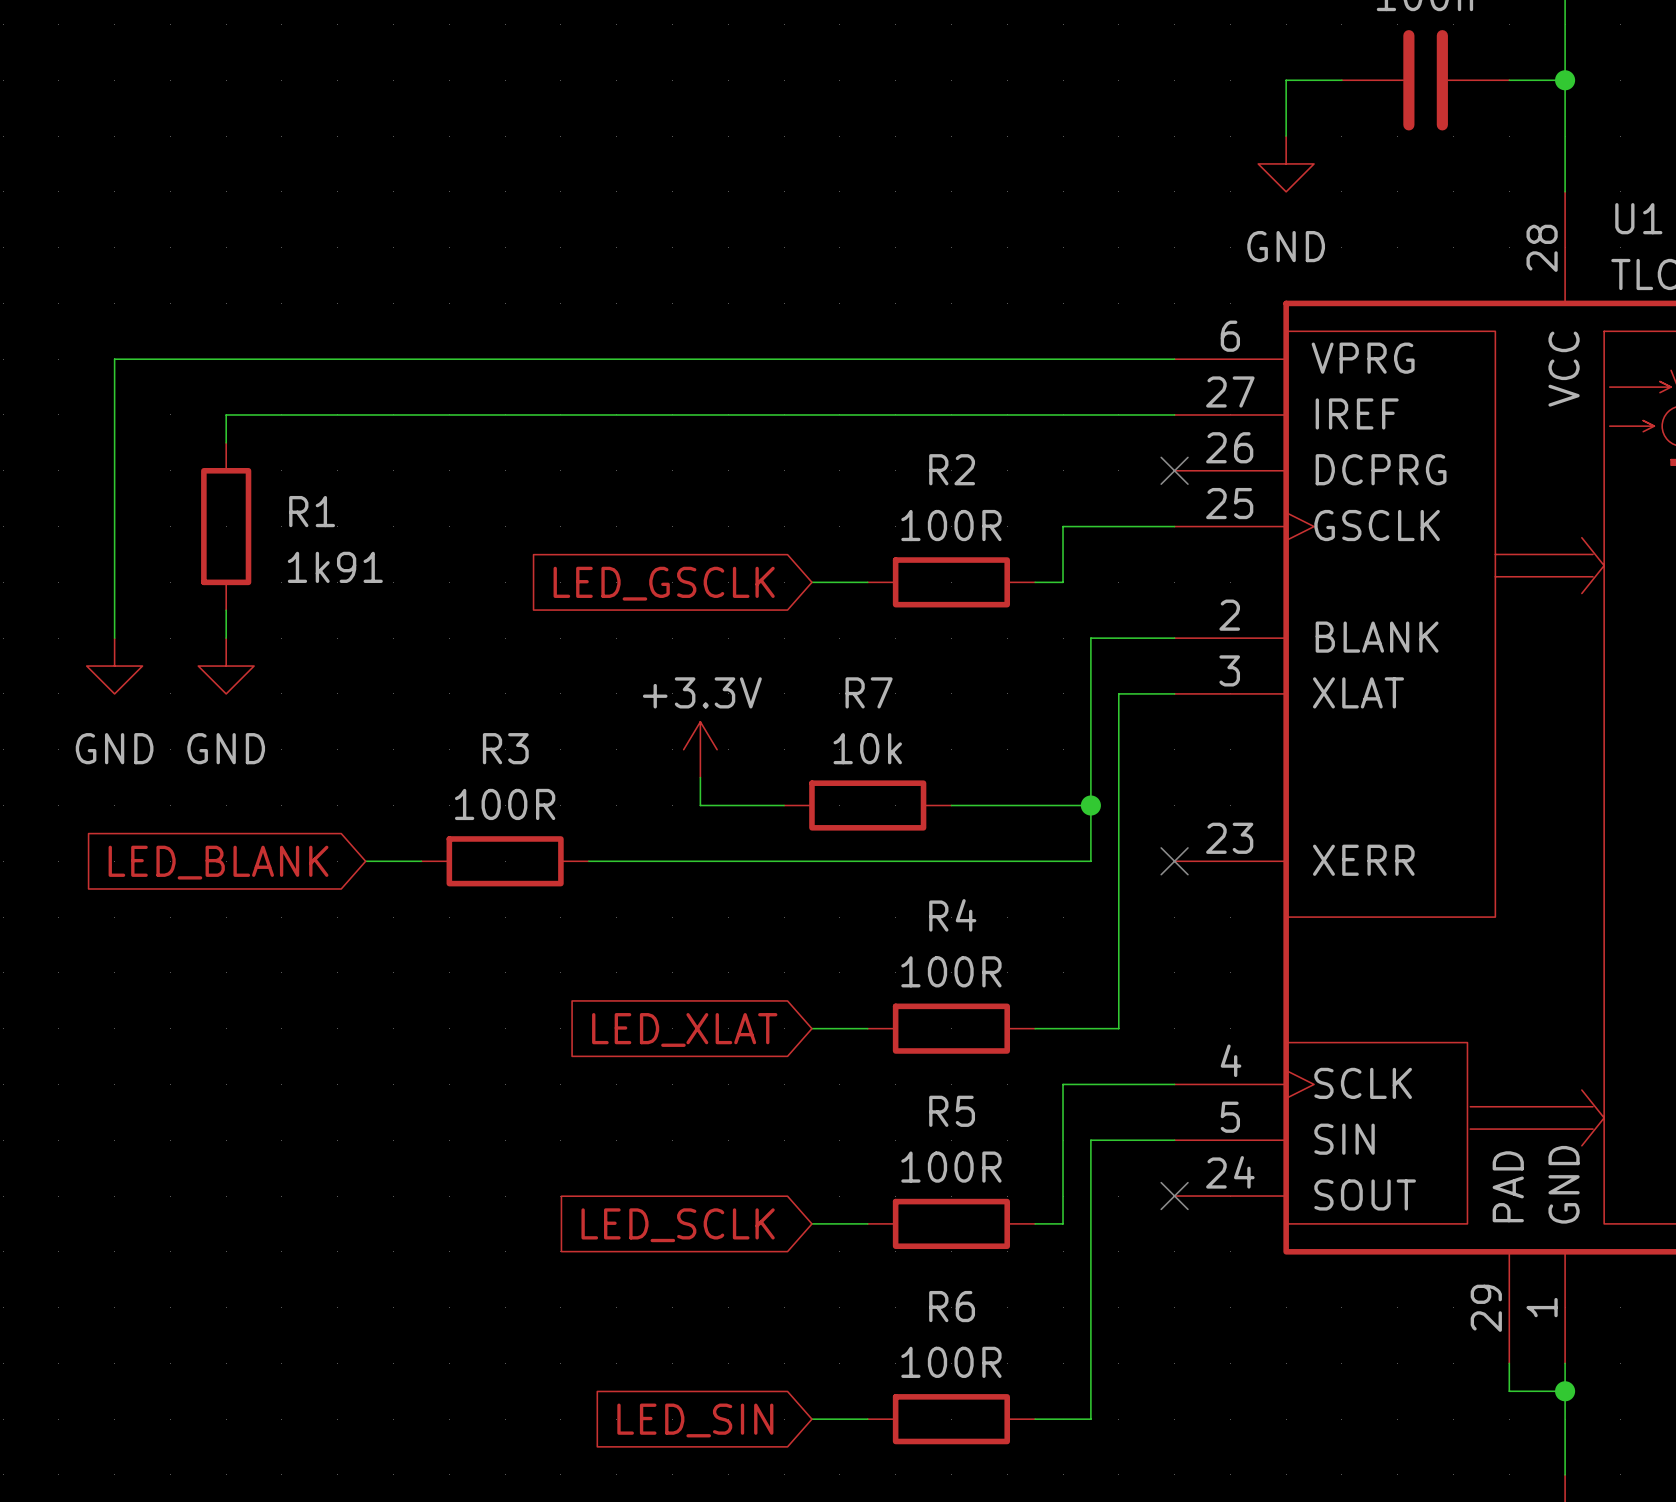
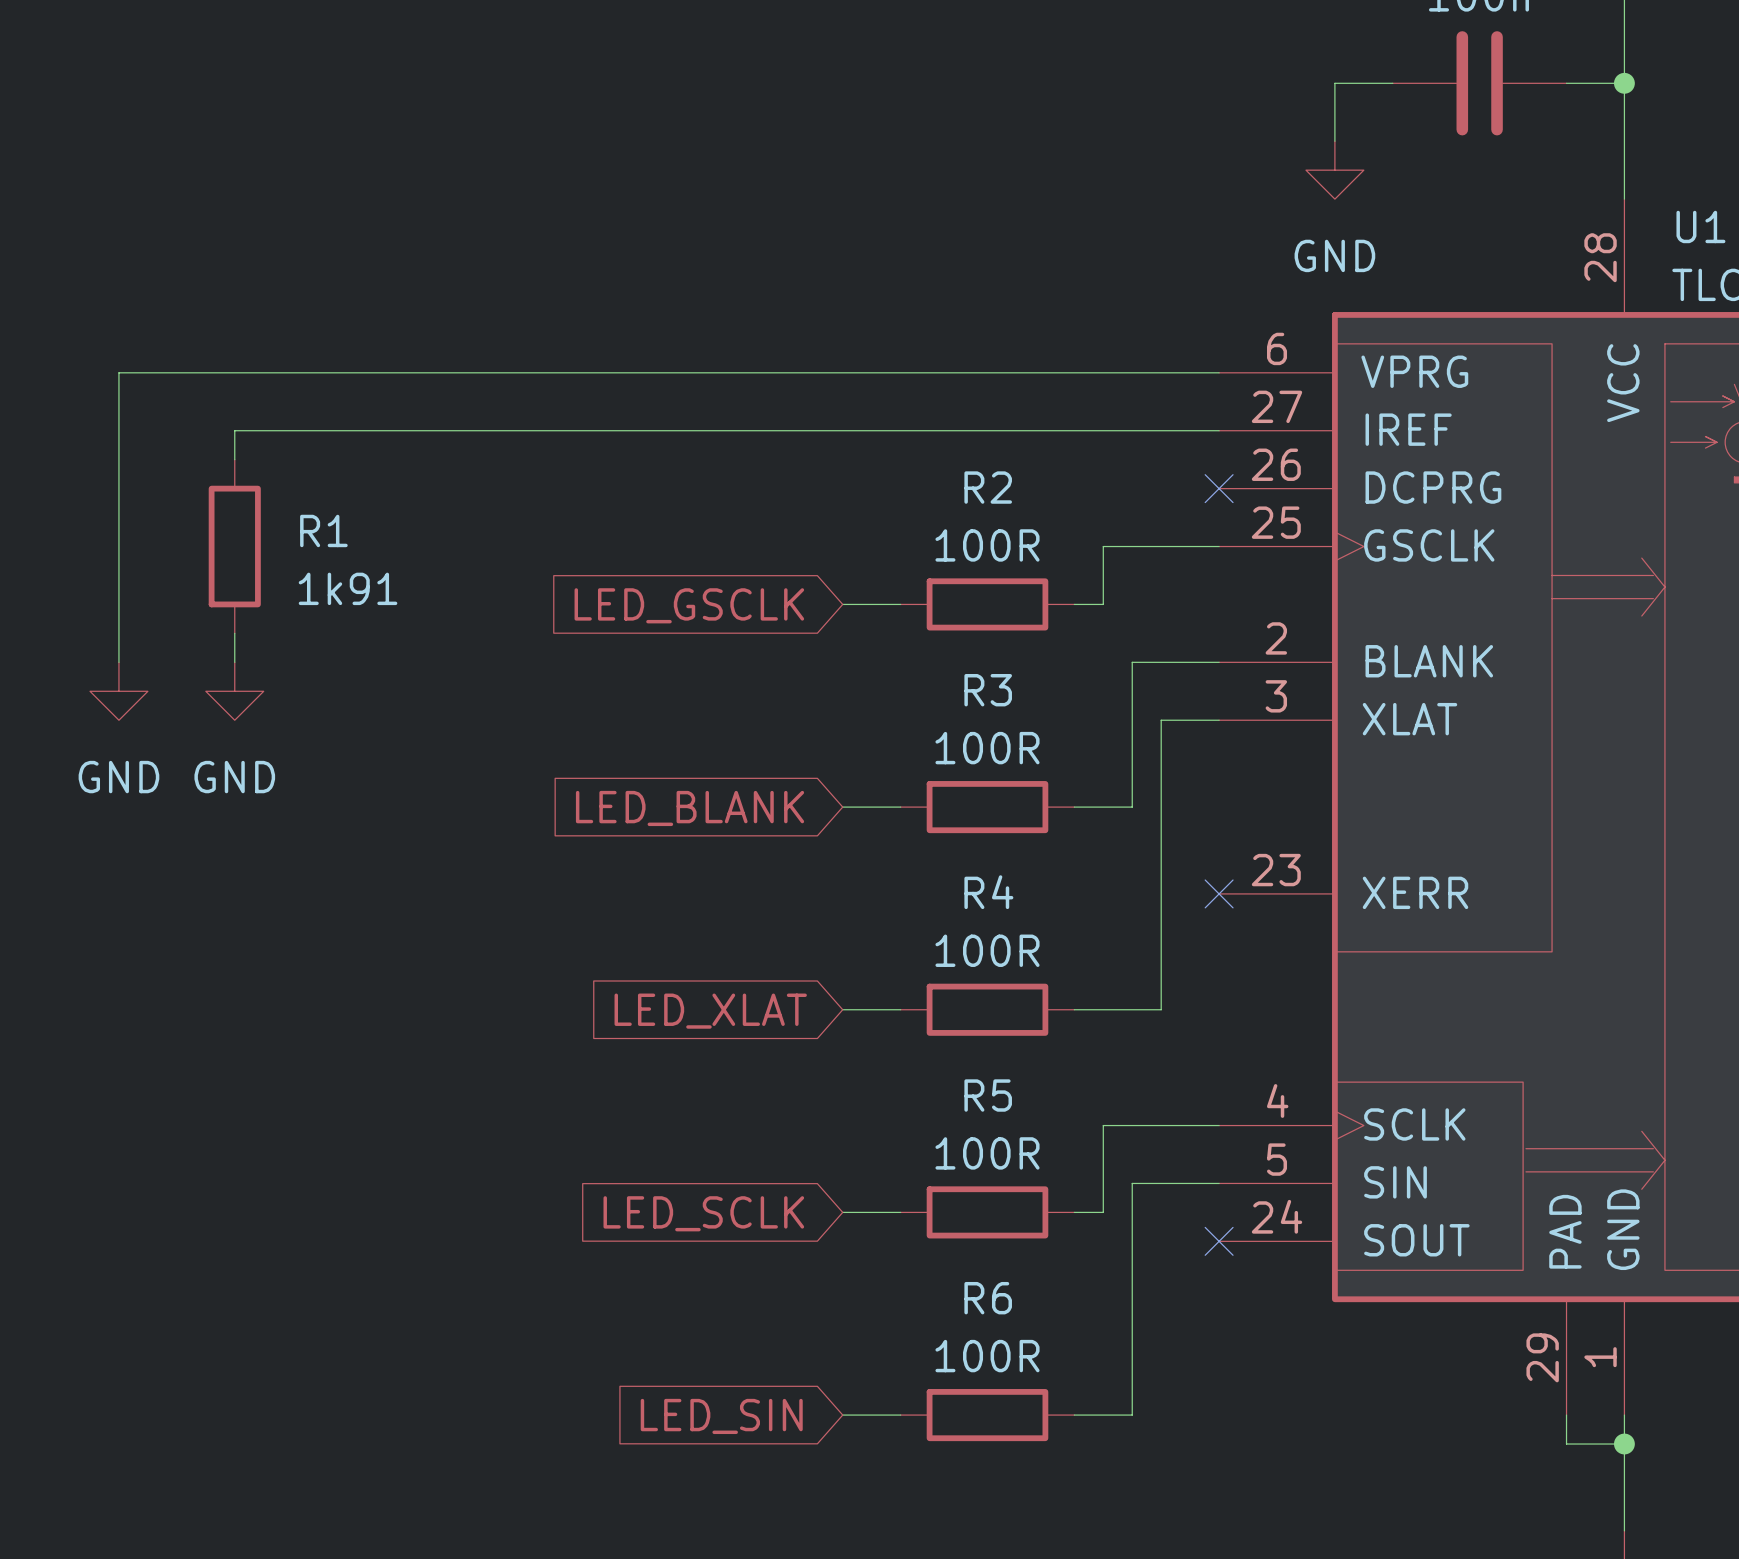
power symbol: +3.3V (700, 749) -> none
wire: (700, 777) (700, 805) (784, 805) -> none
wire: (1090, 777) (1090, 861) (588, 861) -> (1132, 807) (1074, 807)
R7: 10k (867, 805) -> none
wire: (951, 805) (1090, 805) -> none
junction: (1090, 805) -> none
wire: (365, 861) (421, 861) -> (842, 807) (900, 807)
R3 position: (505, 861) -> (987, 807)
global label position: LED_BLANK (218, 862) -> LED_BLANK (690, 808)
wire: (1118, 972) (1118, 1028) (1035, 1028) -> (1161, 1009) (1074, 1009)
wire: (811, 1028) (867, 1028) -> (842, 1009) (900, 1009)
R4 position: (951, 1028) -> (987, 1009)
global label position: LED_XLAT (684, 1029) -> LED_XLAT (710, 1011)
wire: (1063, 1168) (1063, 1223) (1035, 1223) -> (1103, 1212) (1074, 1212)
wire: (811, 1223) (867, 1223) -> (842, 1212) (900, 1212)
R5 position: (951, 1223) -> (987, 1212)
global label position: LED_SCLK (678, 1225) -> LED_SCLK (703, 1213)
wire: (1090, 1363) (1090, 1419) (1035, 1419) -> (1132, 1415) (1074, 1415)
wire: (811, 1419) (867, 1419) -> (842, 1415) (900, 1415)
R6 position: (951, 1419) -> (987, 1415)
global label position: LED_SIN (695, 1420) -> LED_SIN (721, 1416)

